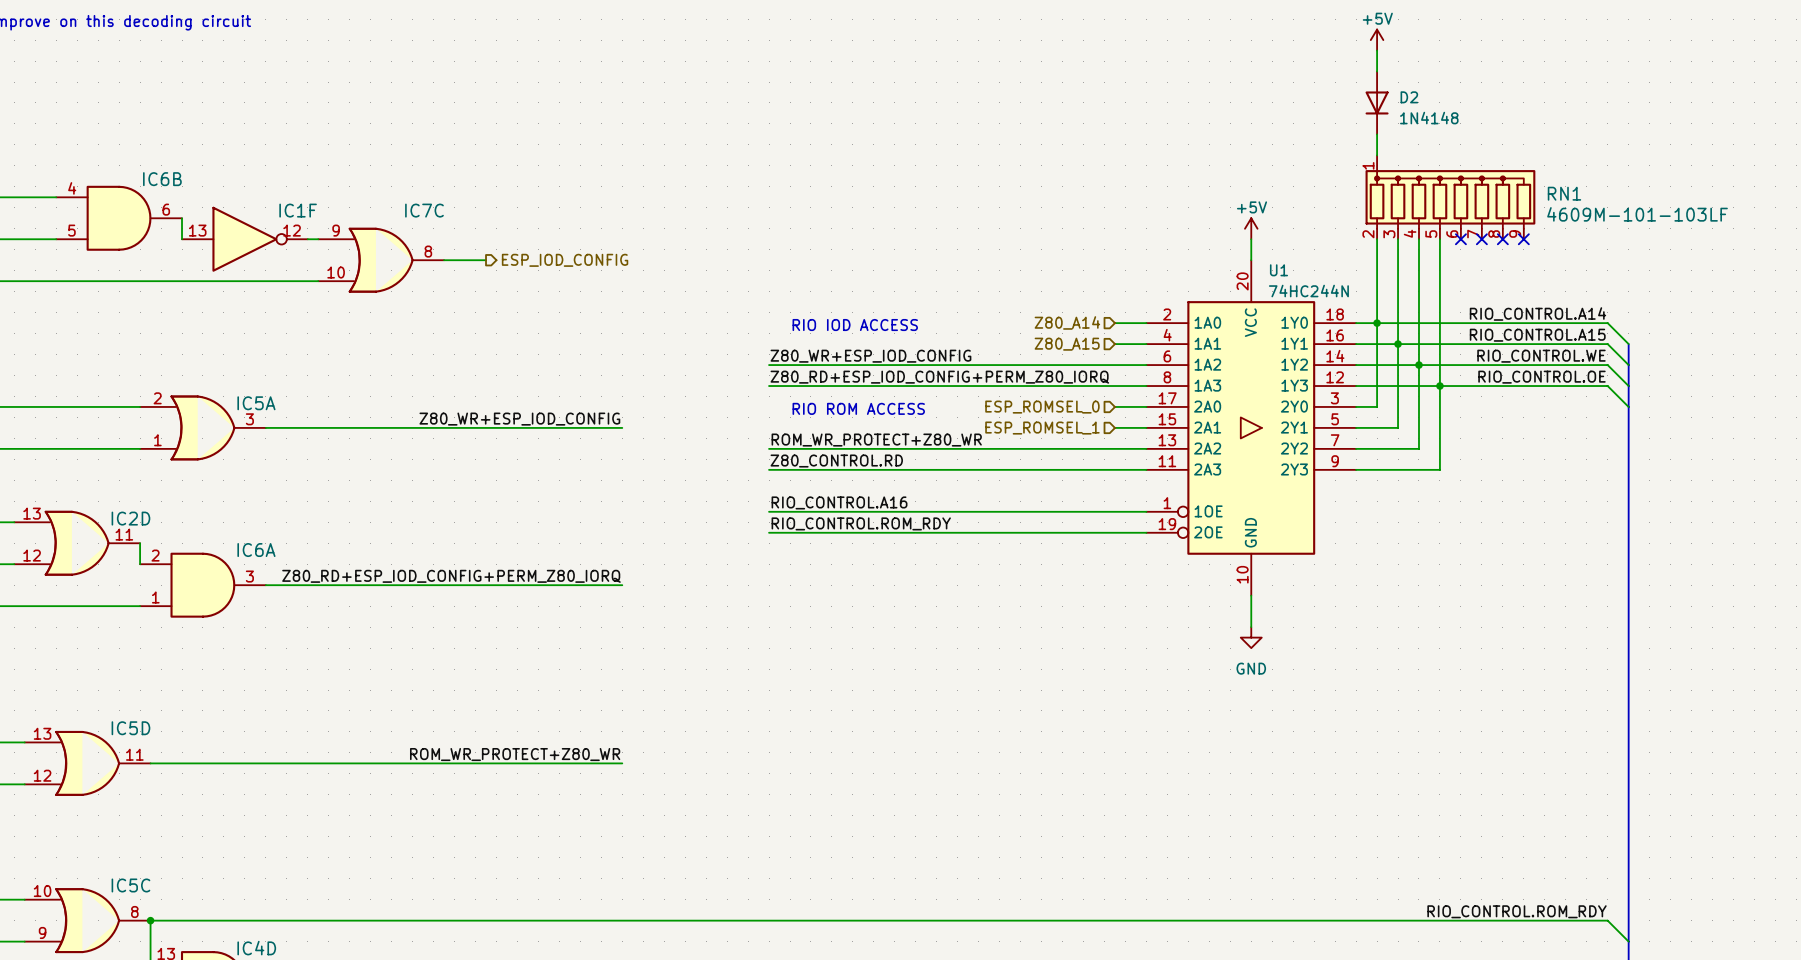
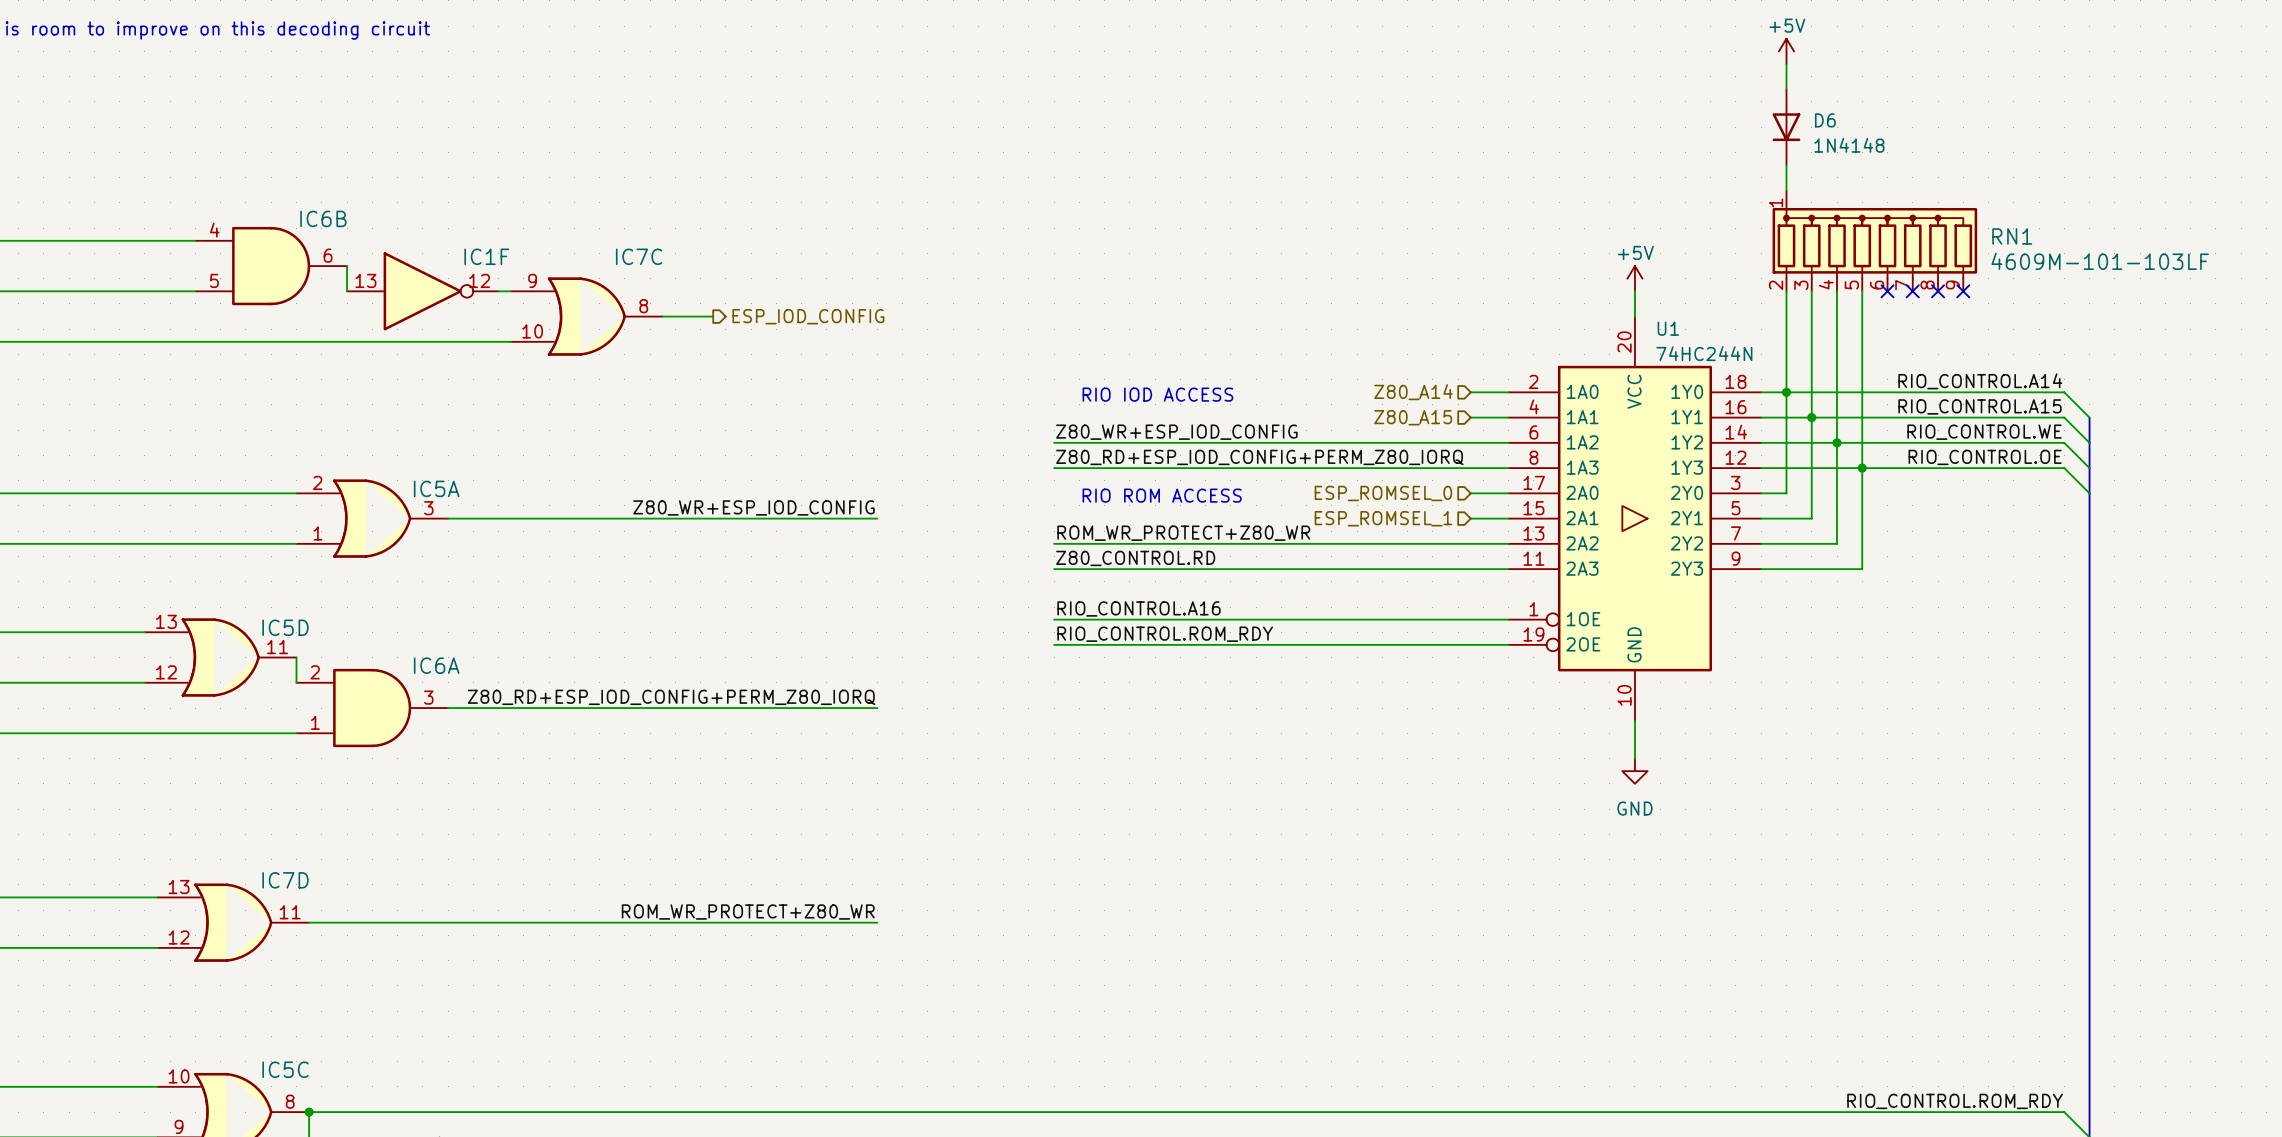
D2 name: D2 (1409, 97) -> D6 (1825, 120)
IC2D name: IC2D (130, 518) -> IC5D (285, 627)
IC5D name: IC5D (130, 728) -> IC7D (285, 880)

